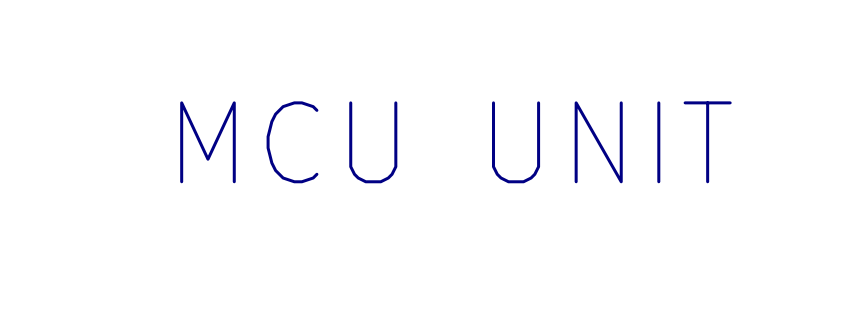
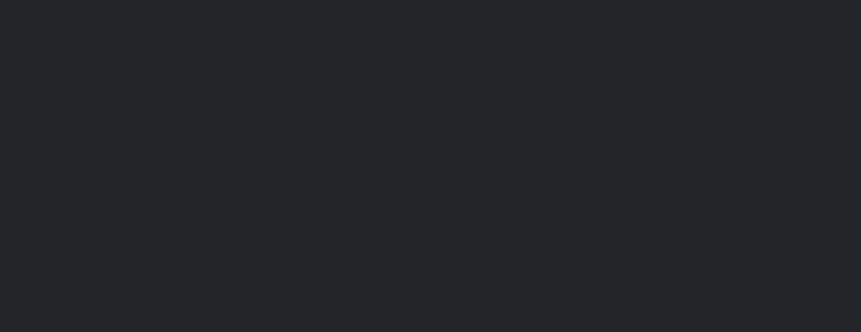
text: MCU UNIT (455, 142) -> none

